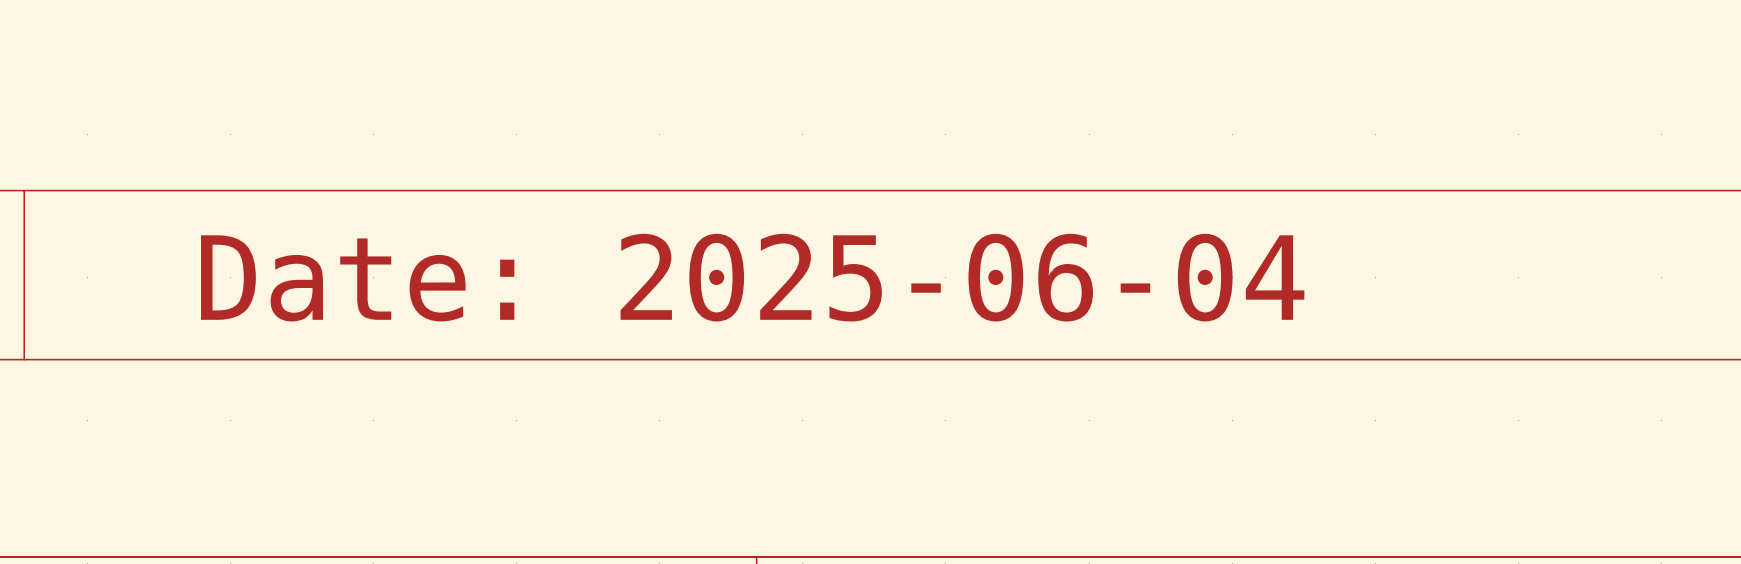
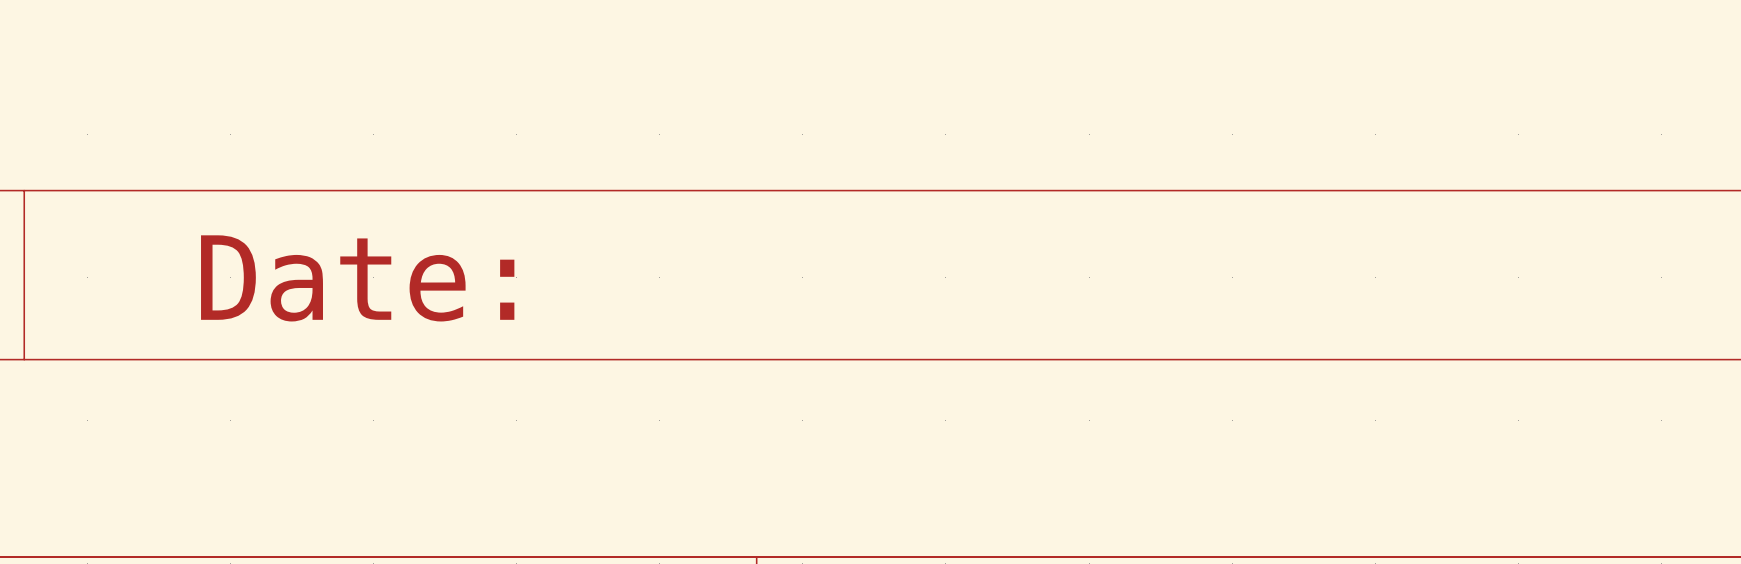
title block: Date: 2025-06-04 (752, 277) -> Date: (357, 278)

